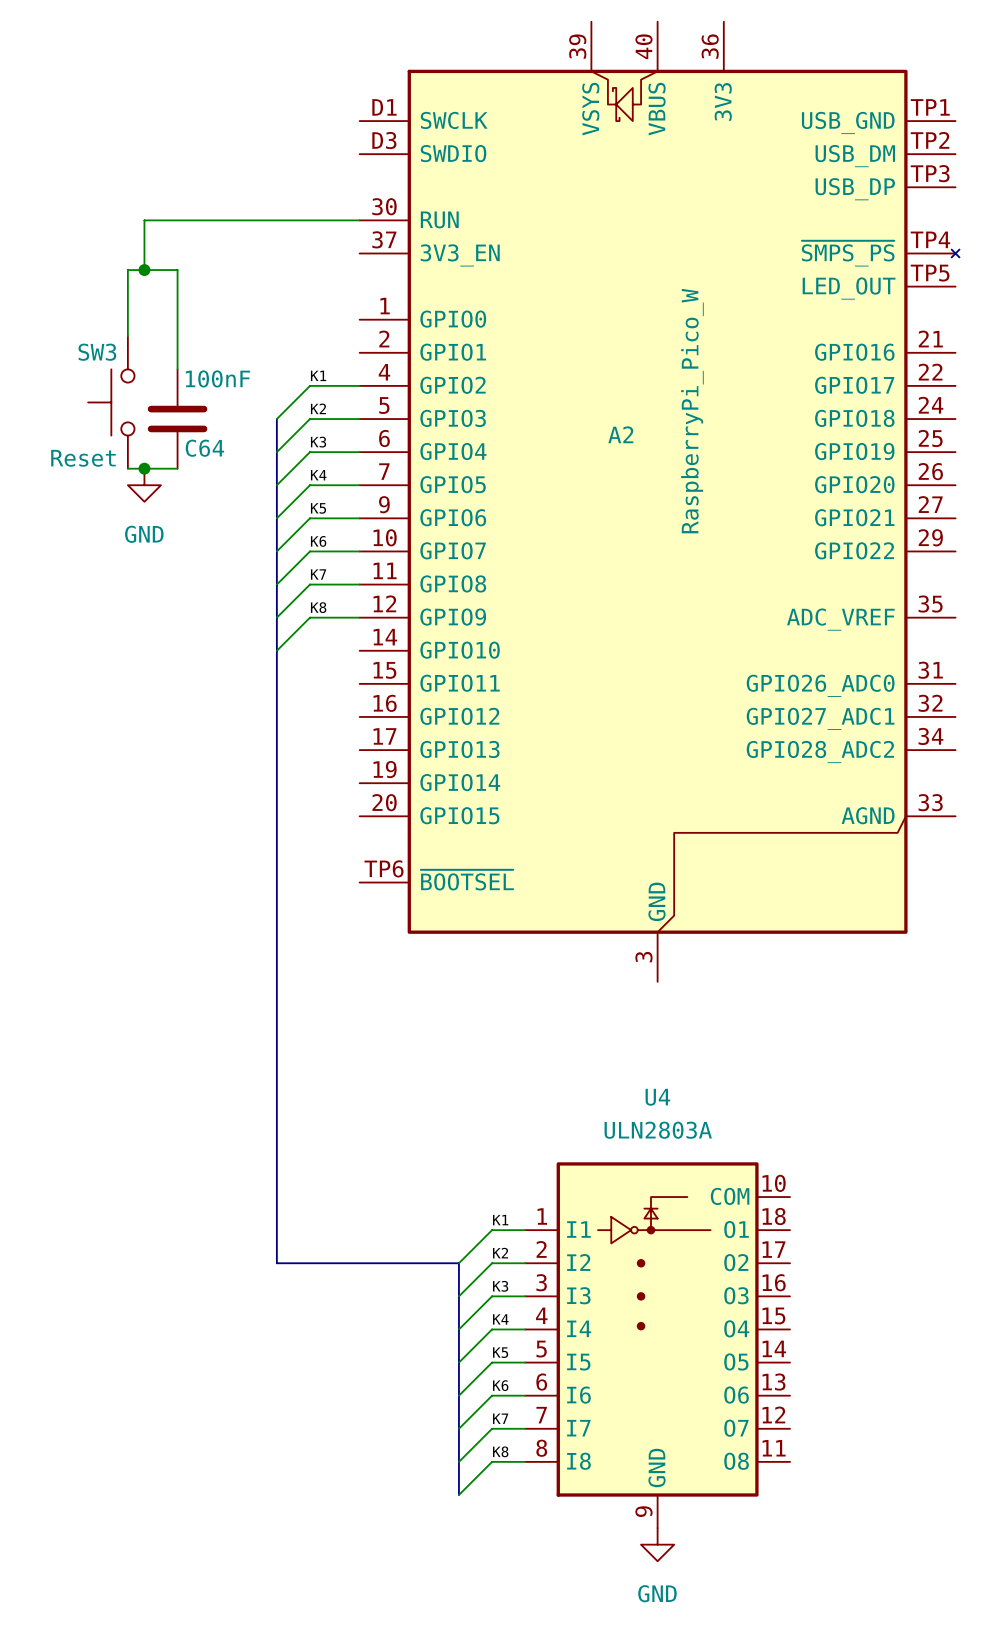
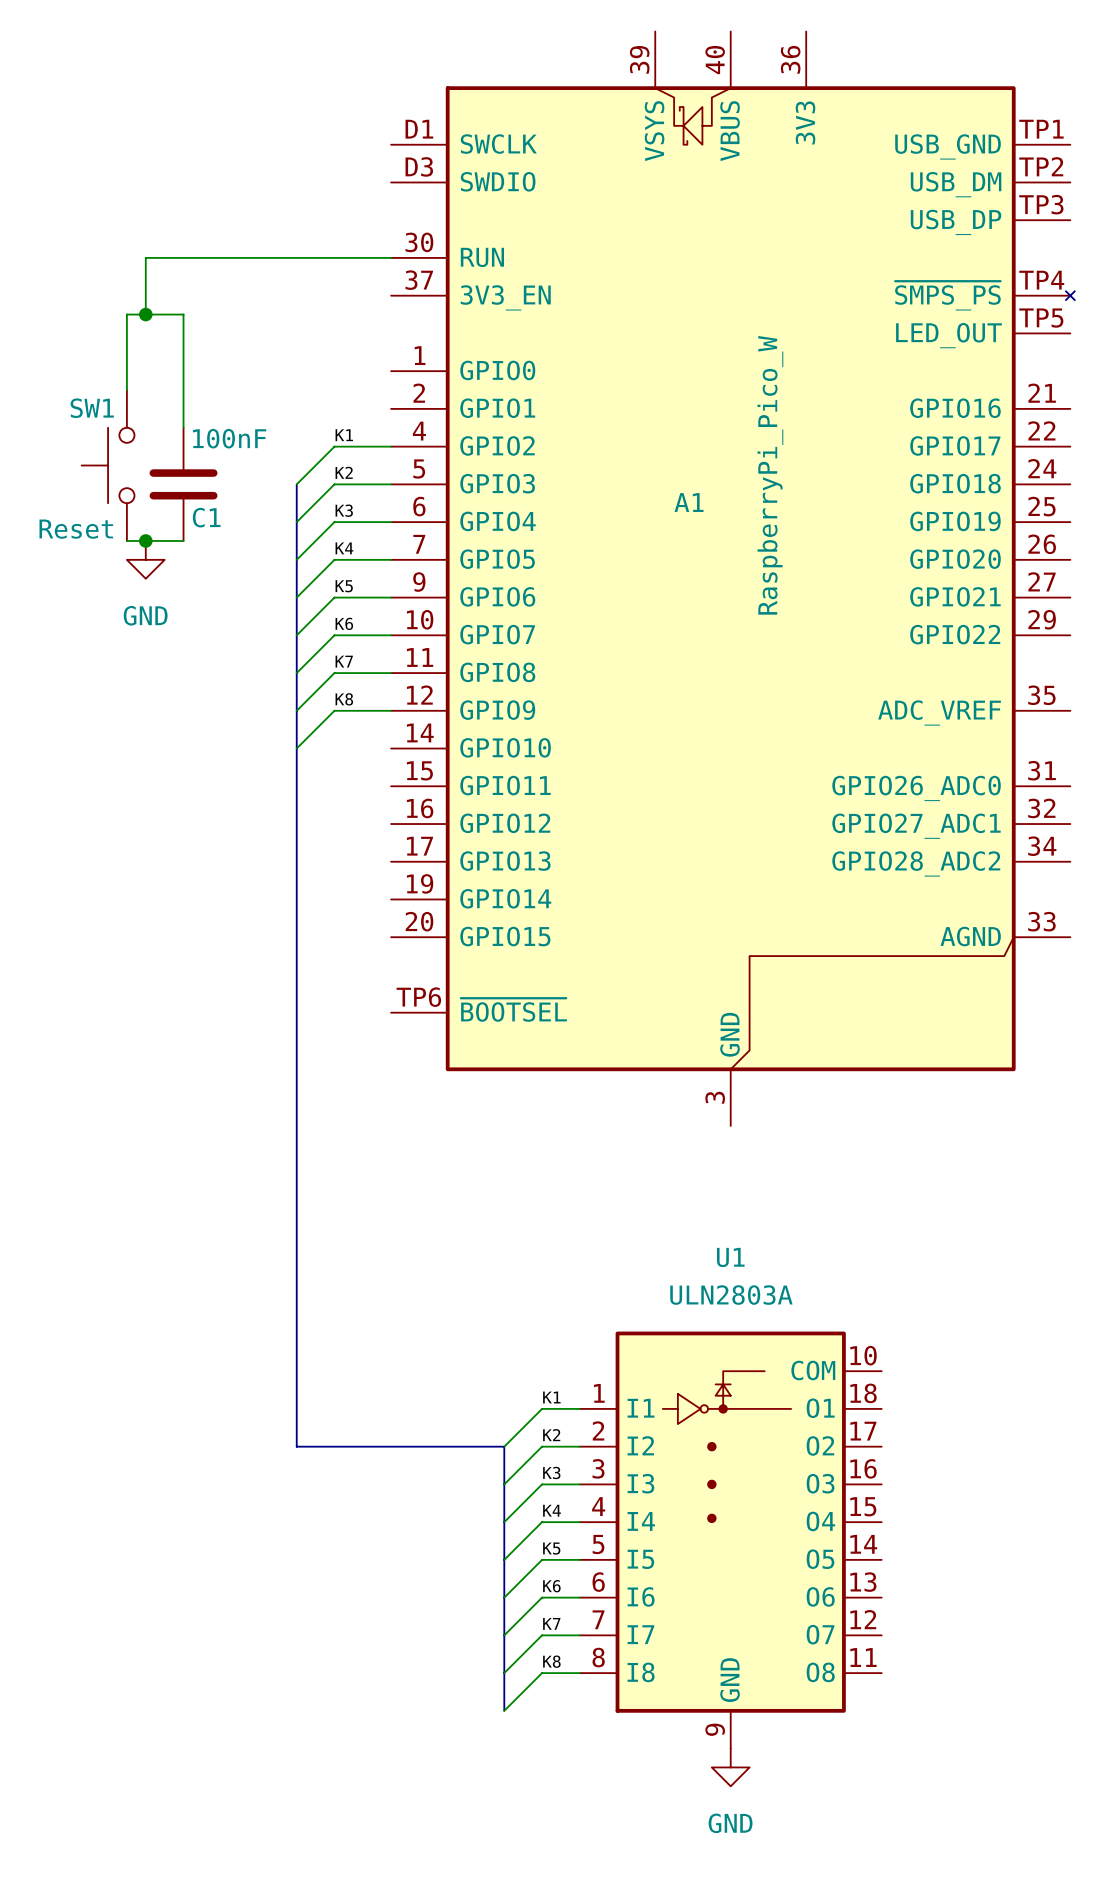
SW3 name: SW3 (97, 352) -> SW1 (92, 408)
A2 name: A2 (620, 434) -> A1 (689, 502)
C64 name: C64 (204, 448) -> C1 (206, 517)
U4 name: U4 (657, 1097) -> U1 (730, 1257)

